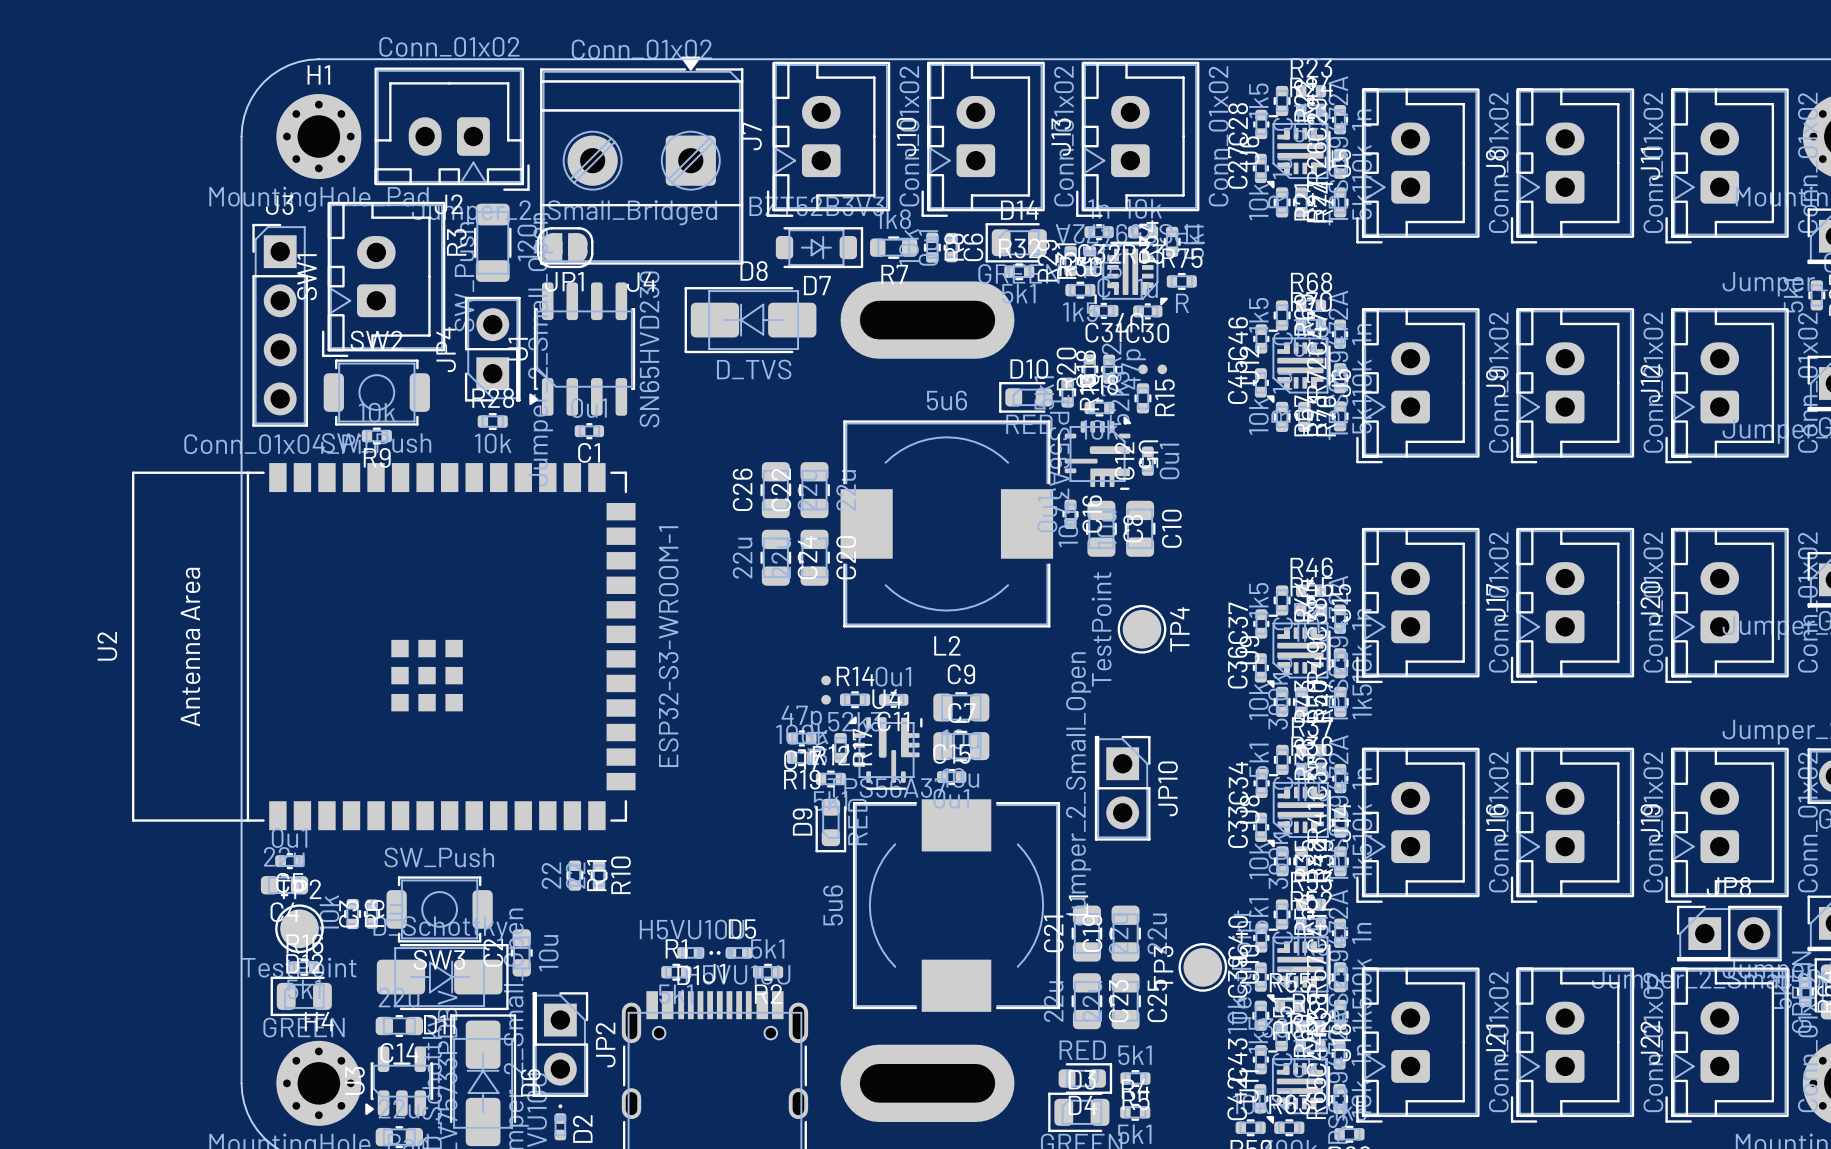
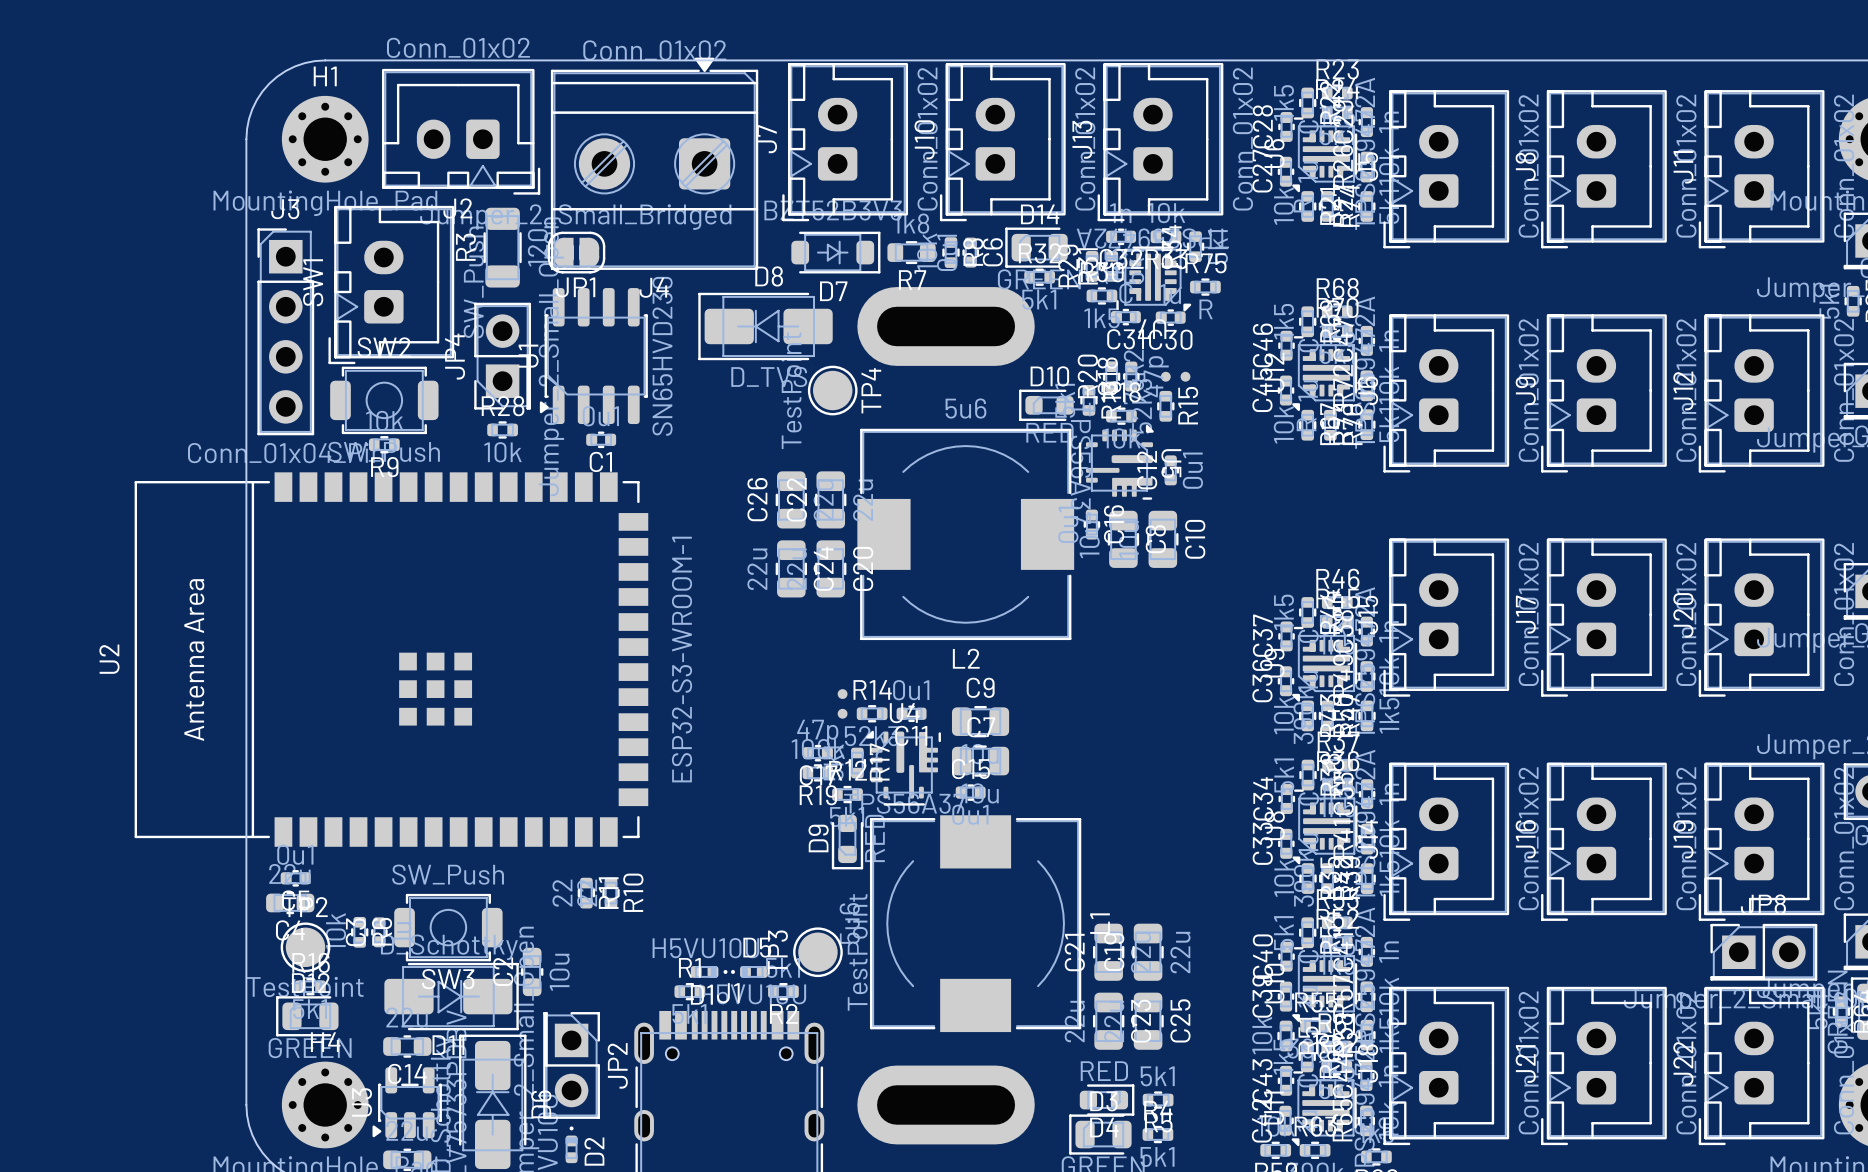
TP4 position: (1142, 629) -> (832, 390)
JP10: Jumper_2_Small_Open (1122, 788) -> none
TP3 position: (1202, 967) -> (817, 952)

